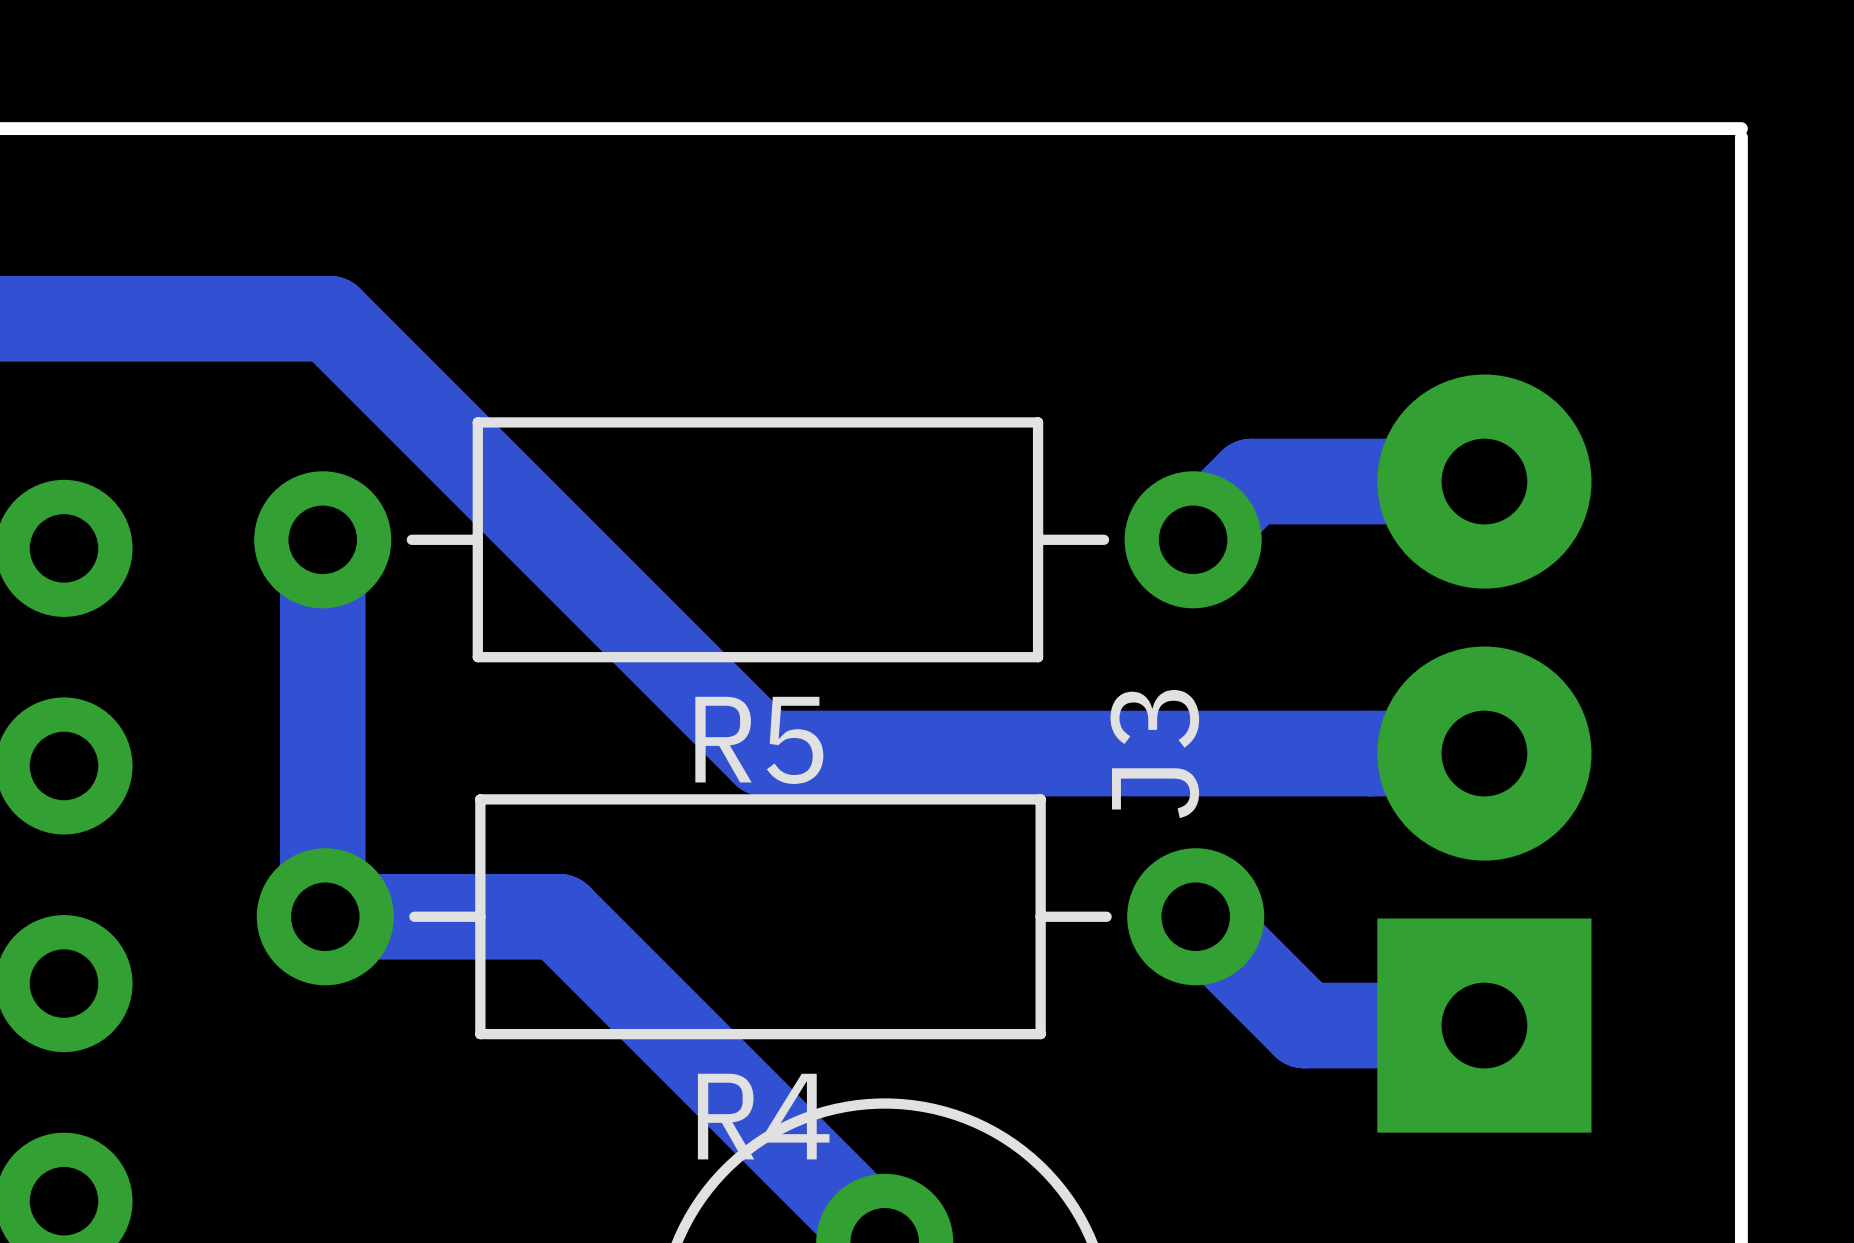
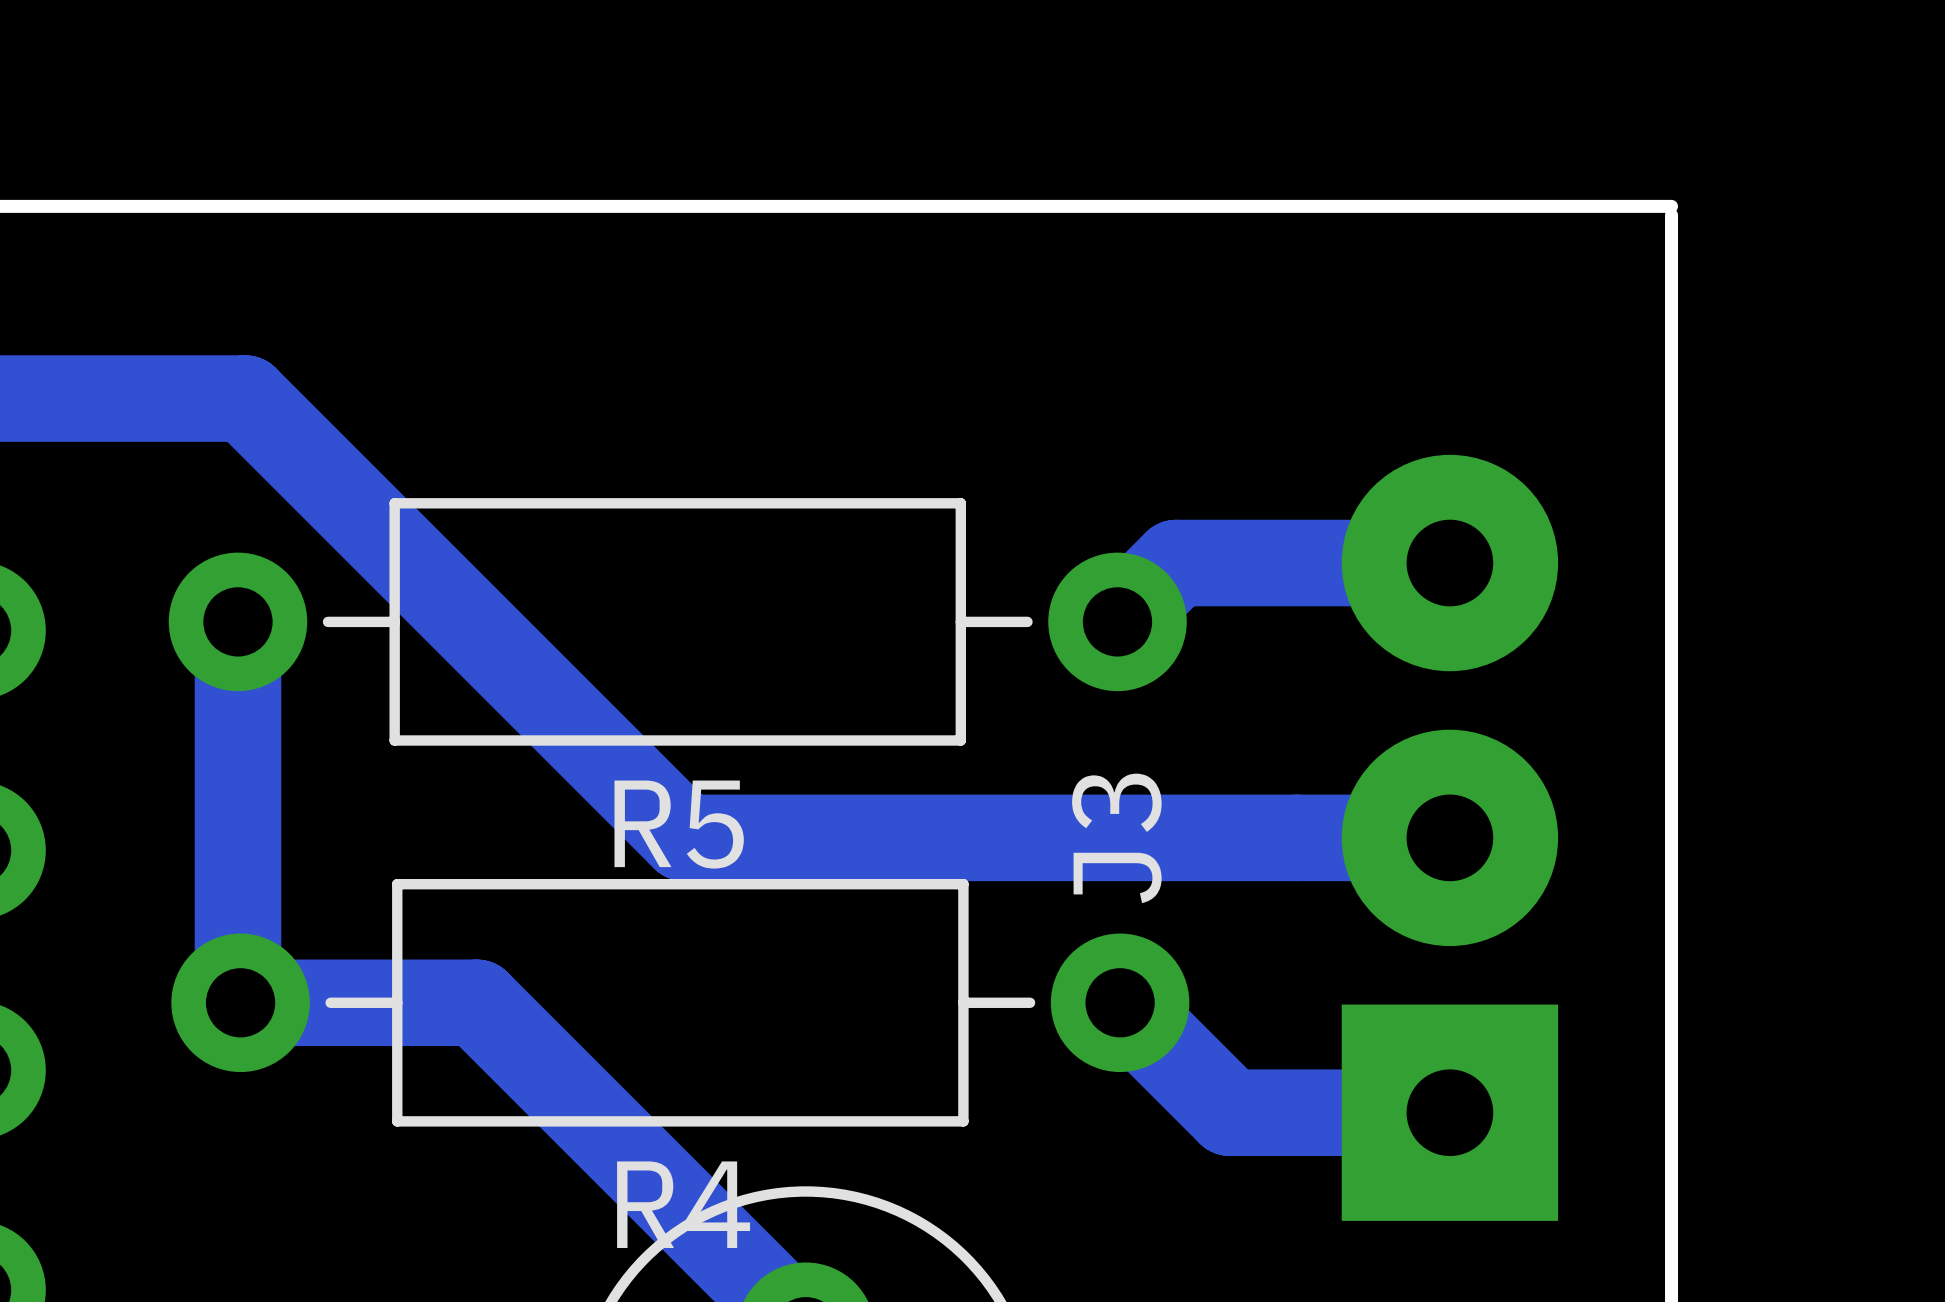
J3 position: (1484, 753) -> (1449, 837)

